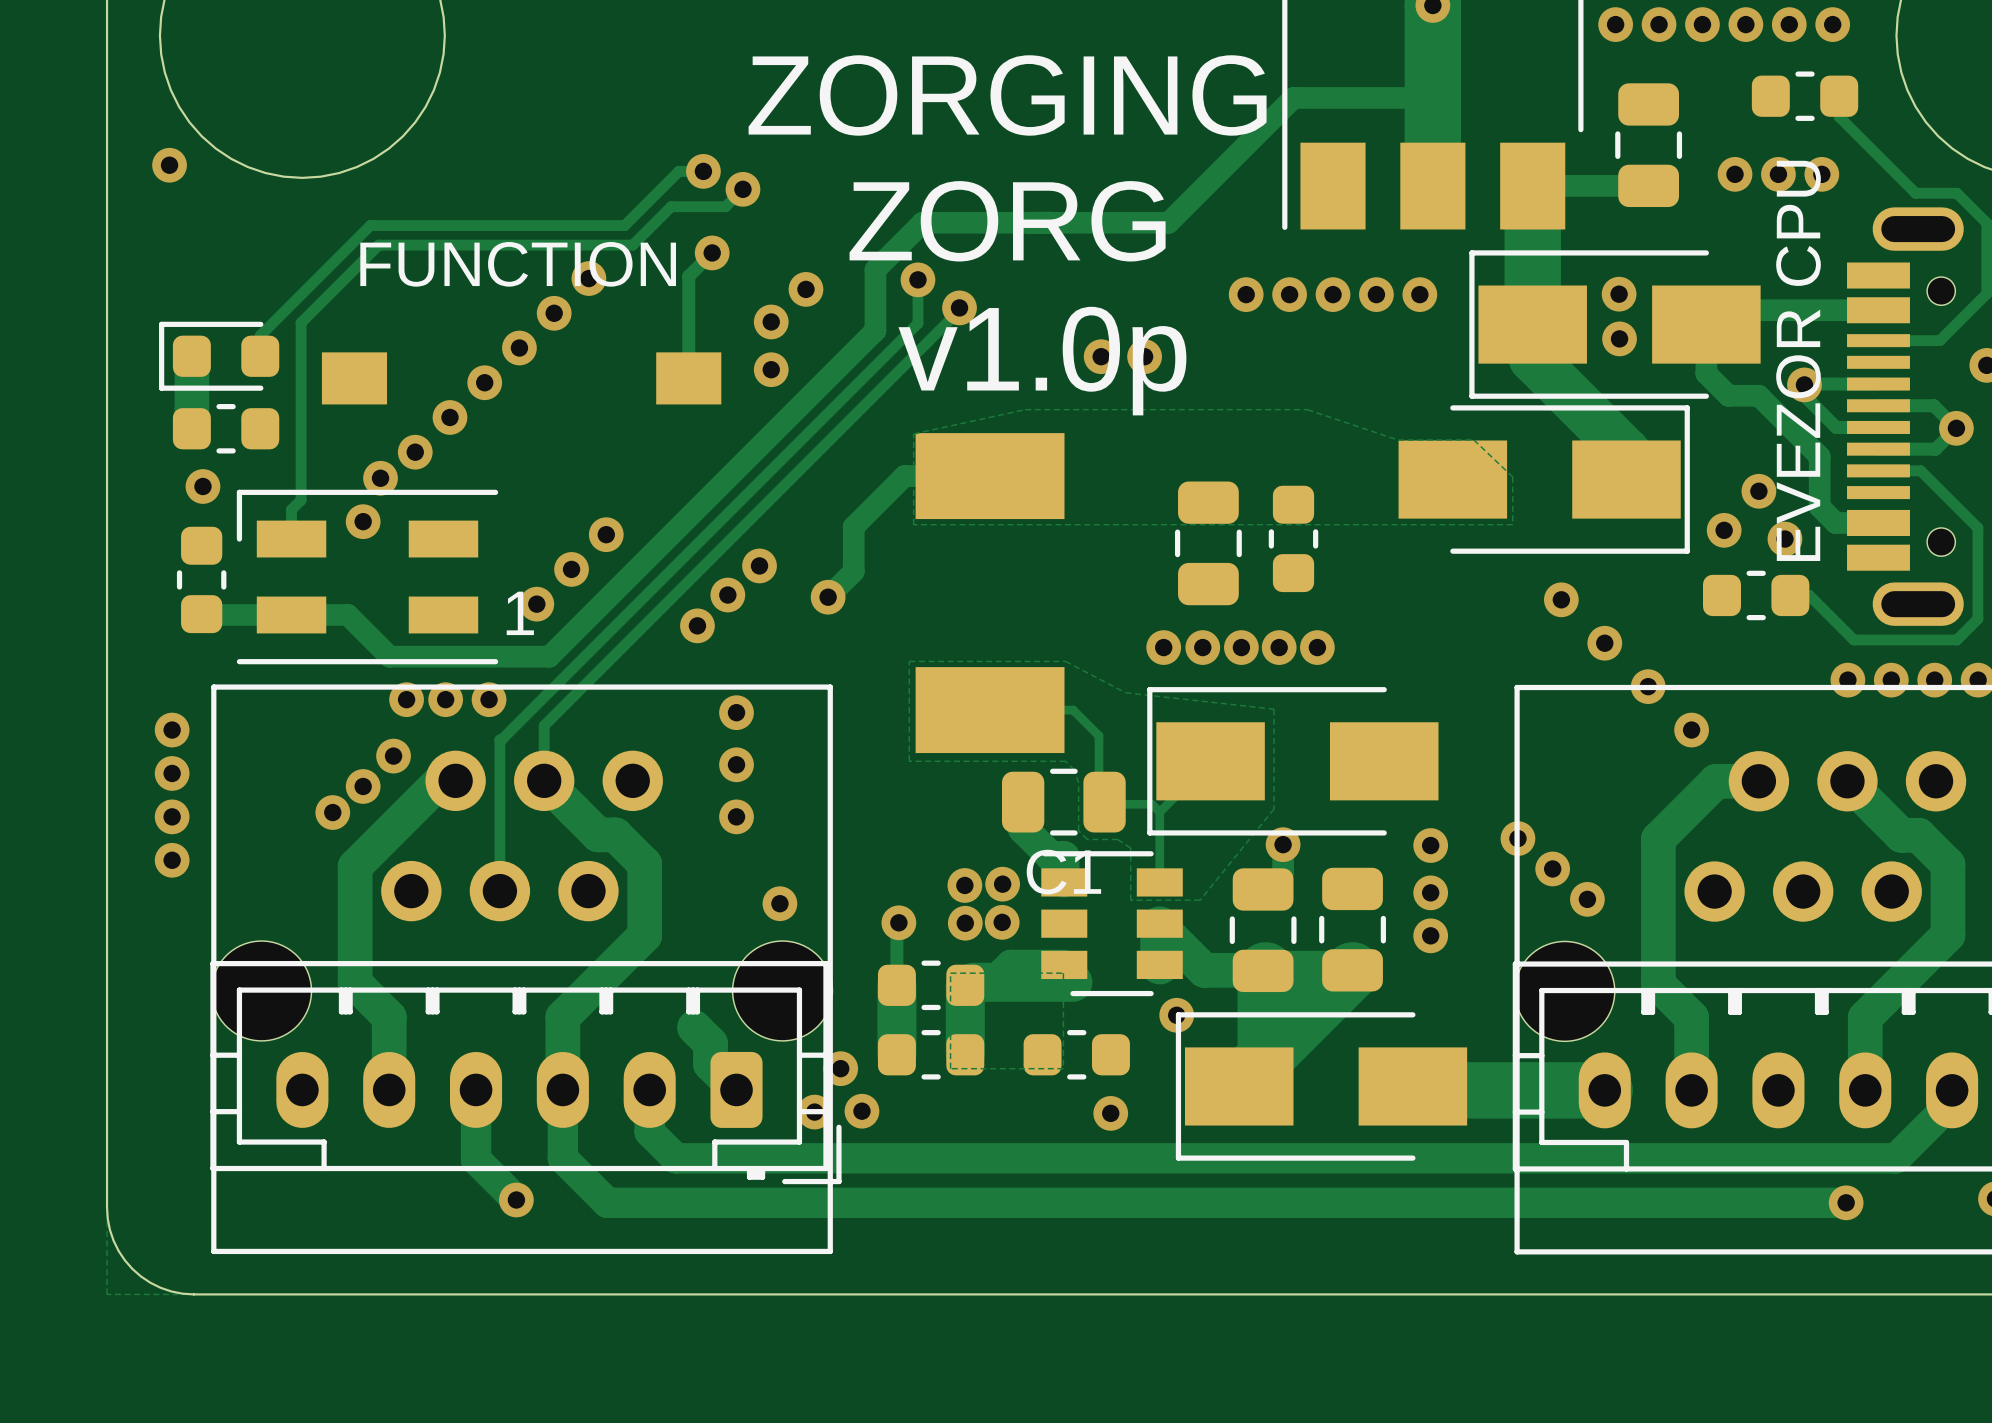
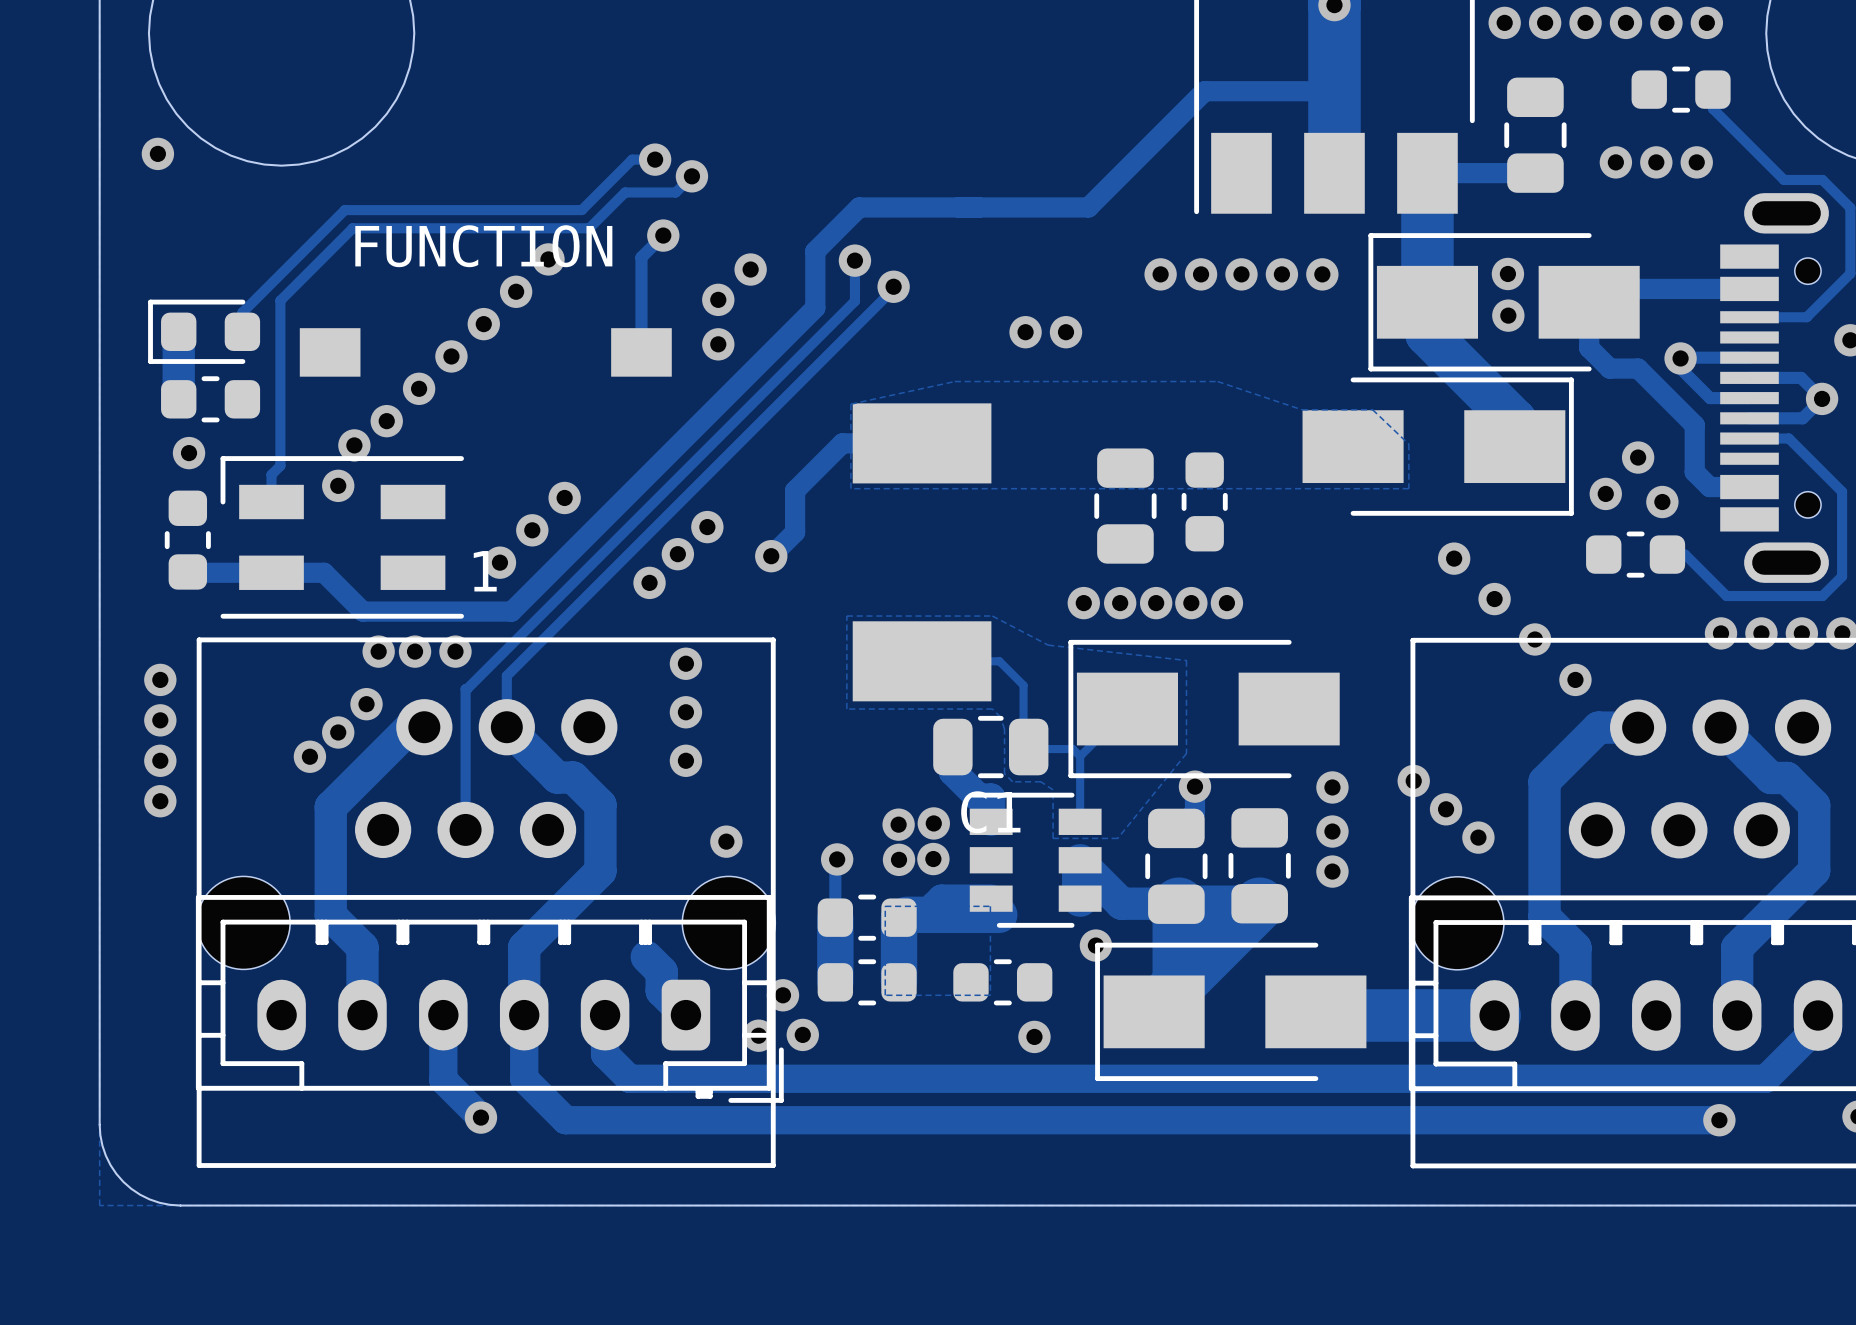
text: ZORGING (1007, 95) -> none
text: ZORG (1007, 221) -> none
text: EVEZOR CPU (1798, 360) -> none
text: v1.0p (1042, 361) -> none

